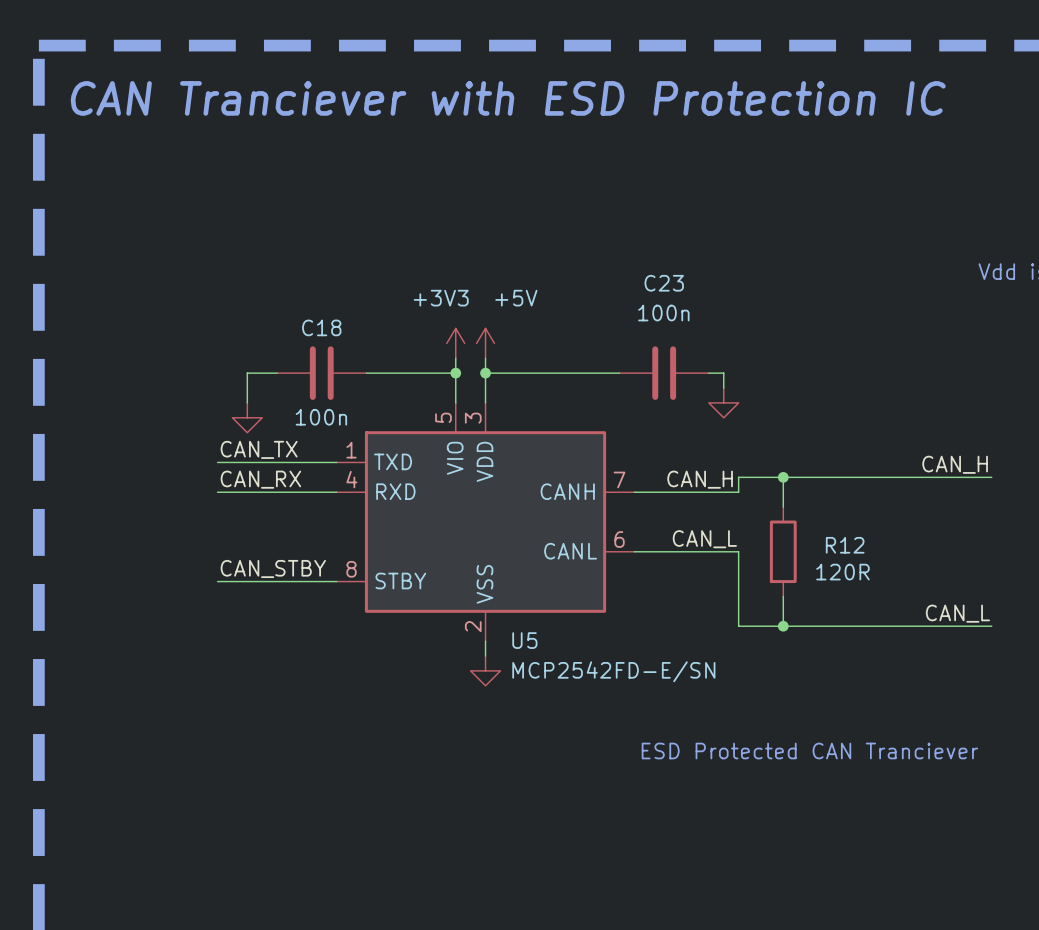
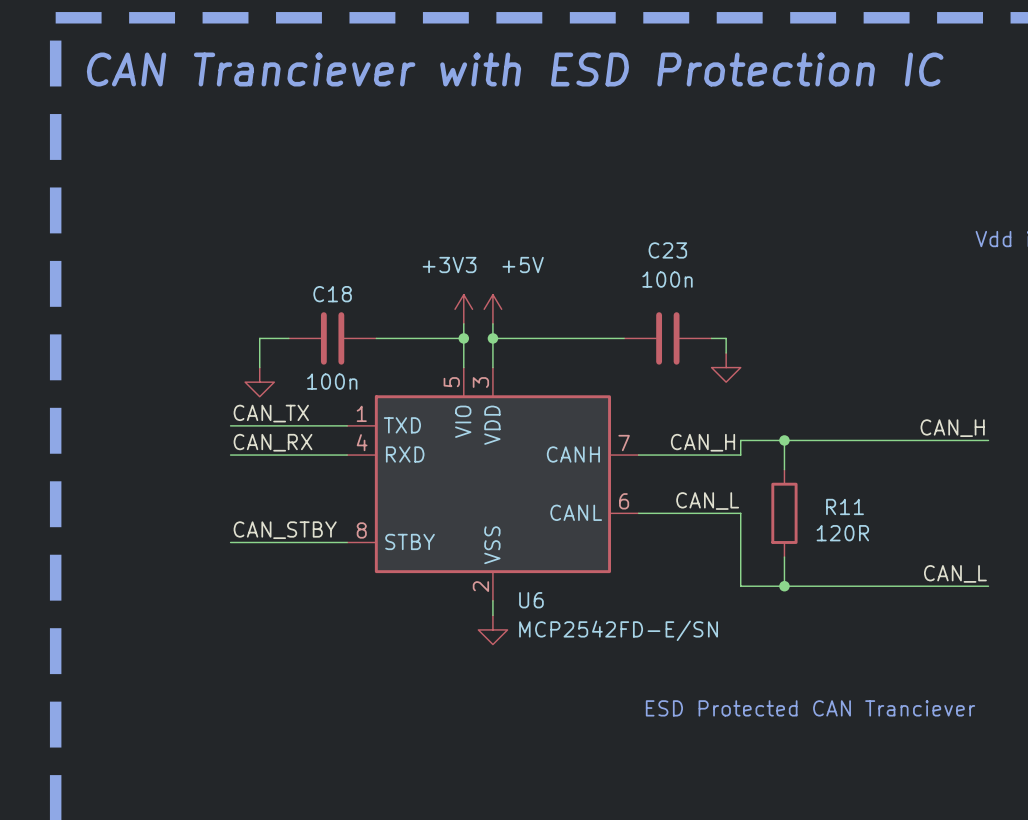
R12 name: R12 (845, 545) -> R11 (845, 506)
U5 name: U5 (524, 640) -> U6 (531, 600)

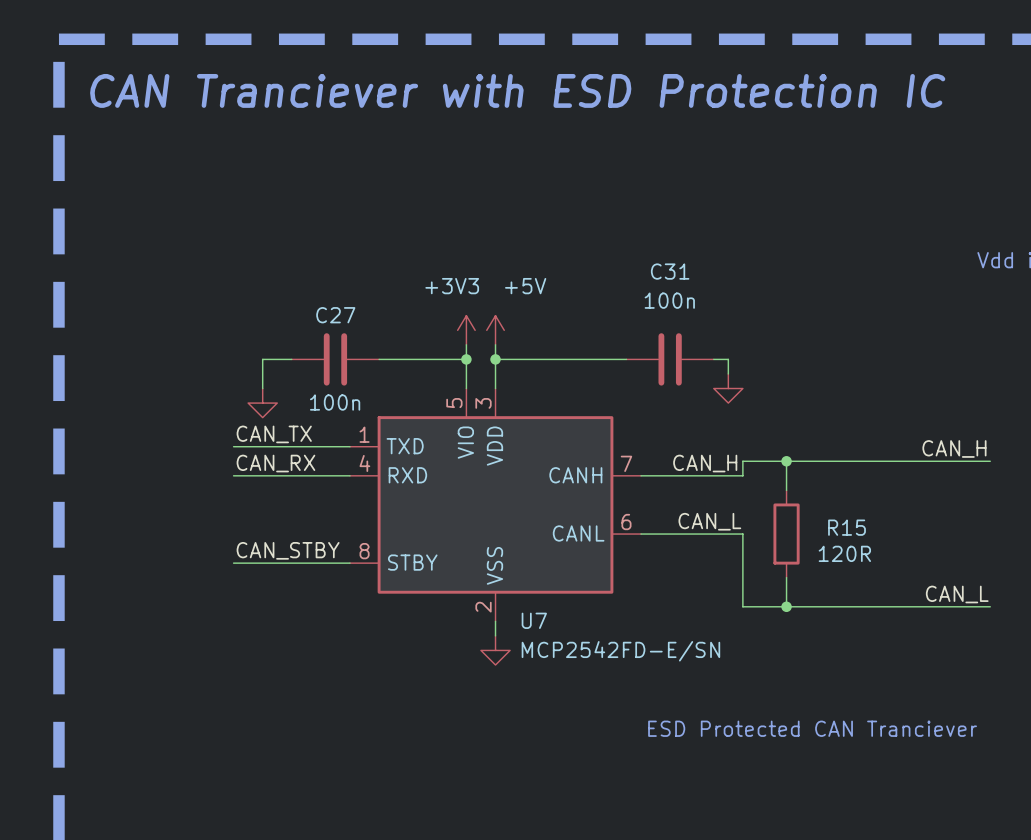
C23 name: C23 (667, 250) -> C31 (670, 271)
C18 name: C18 (332, 294) -> C27 (335, 315)
R11 name: R11 (845, 506) -> R15 (847, 527)
U6 name: U6 (531, 600) -> U7 (534, 620)

